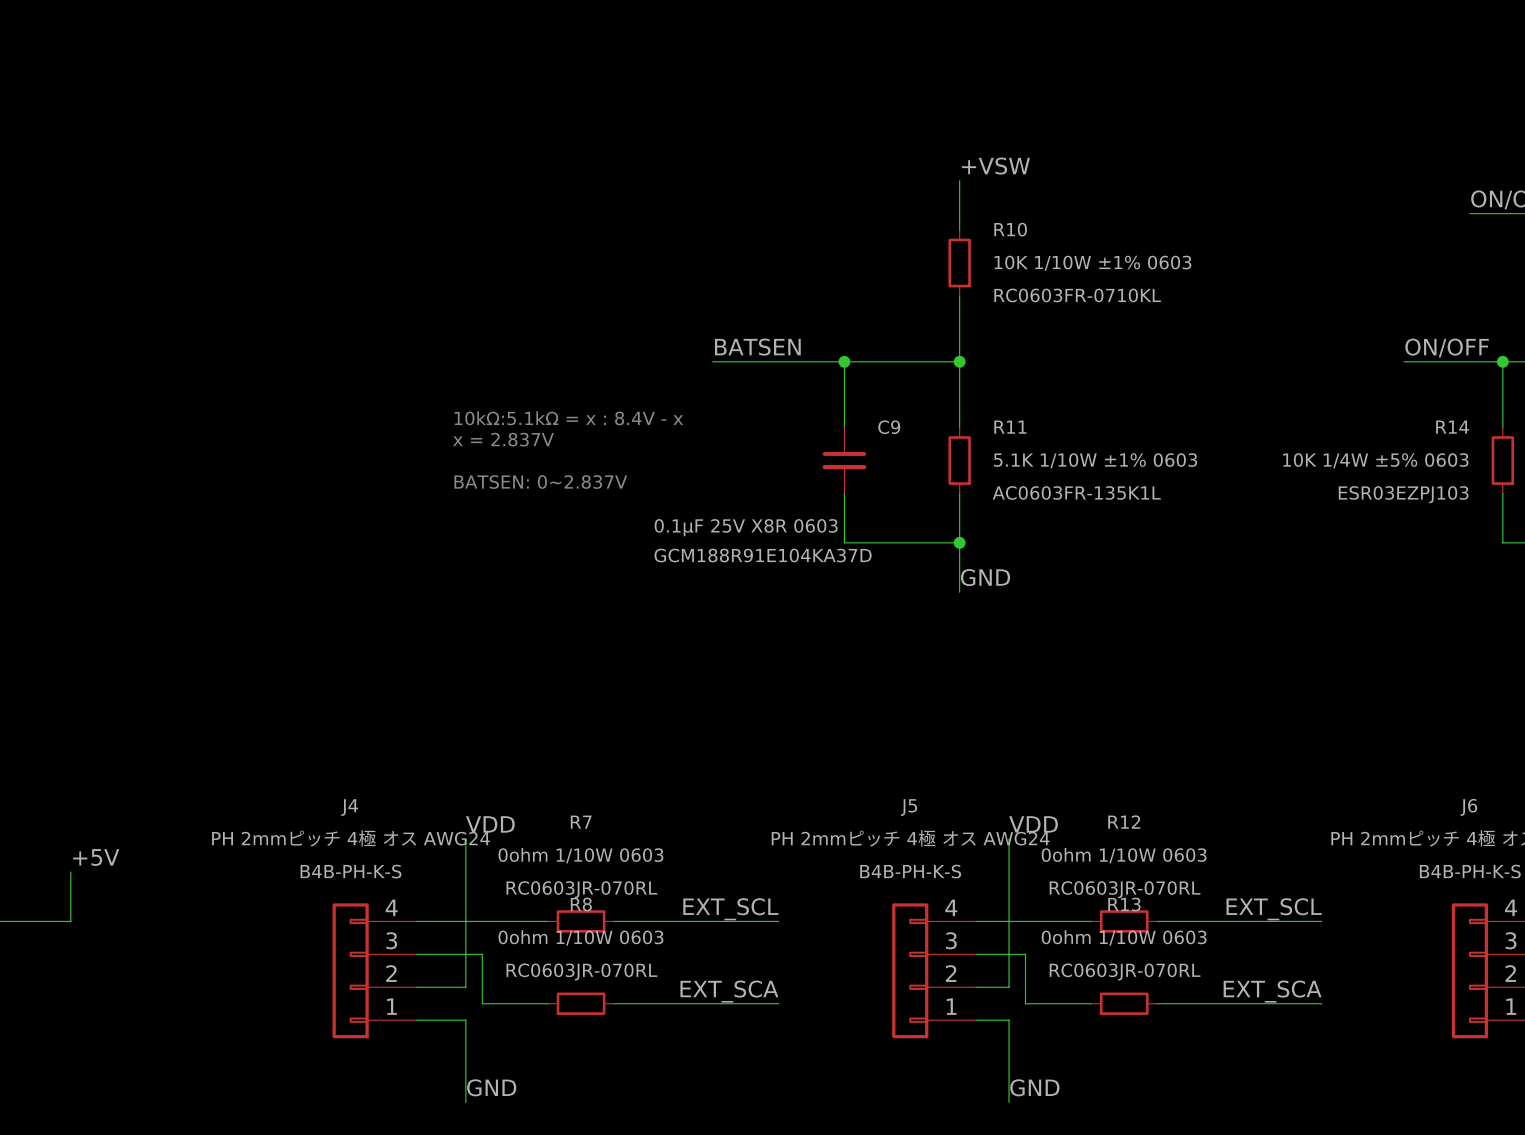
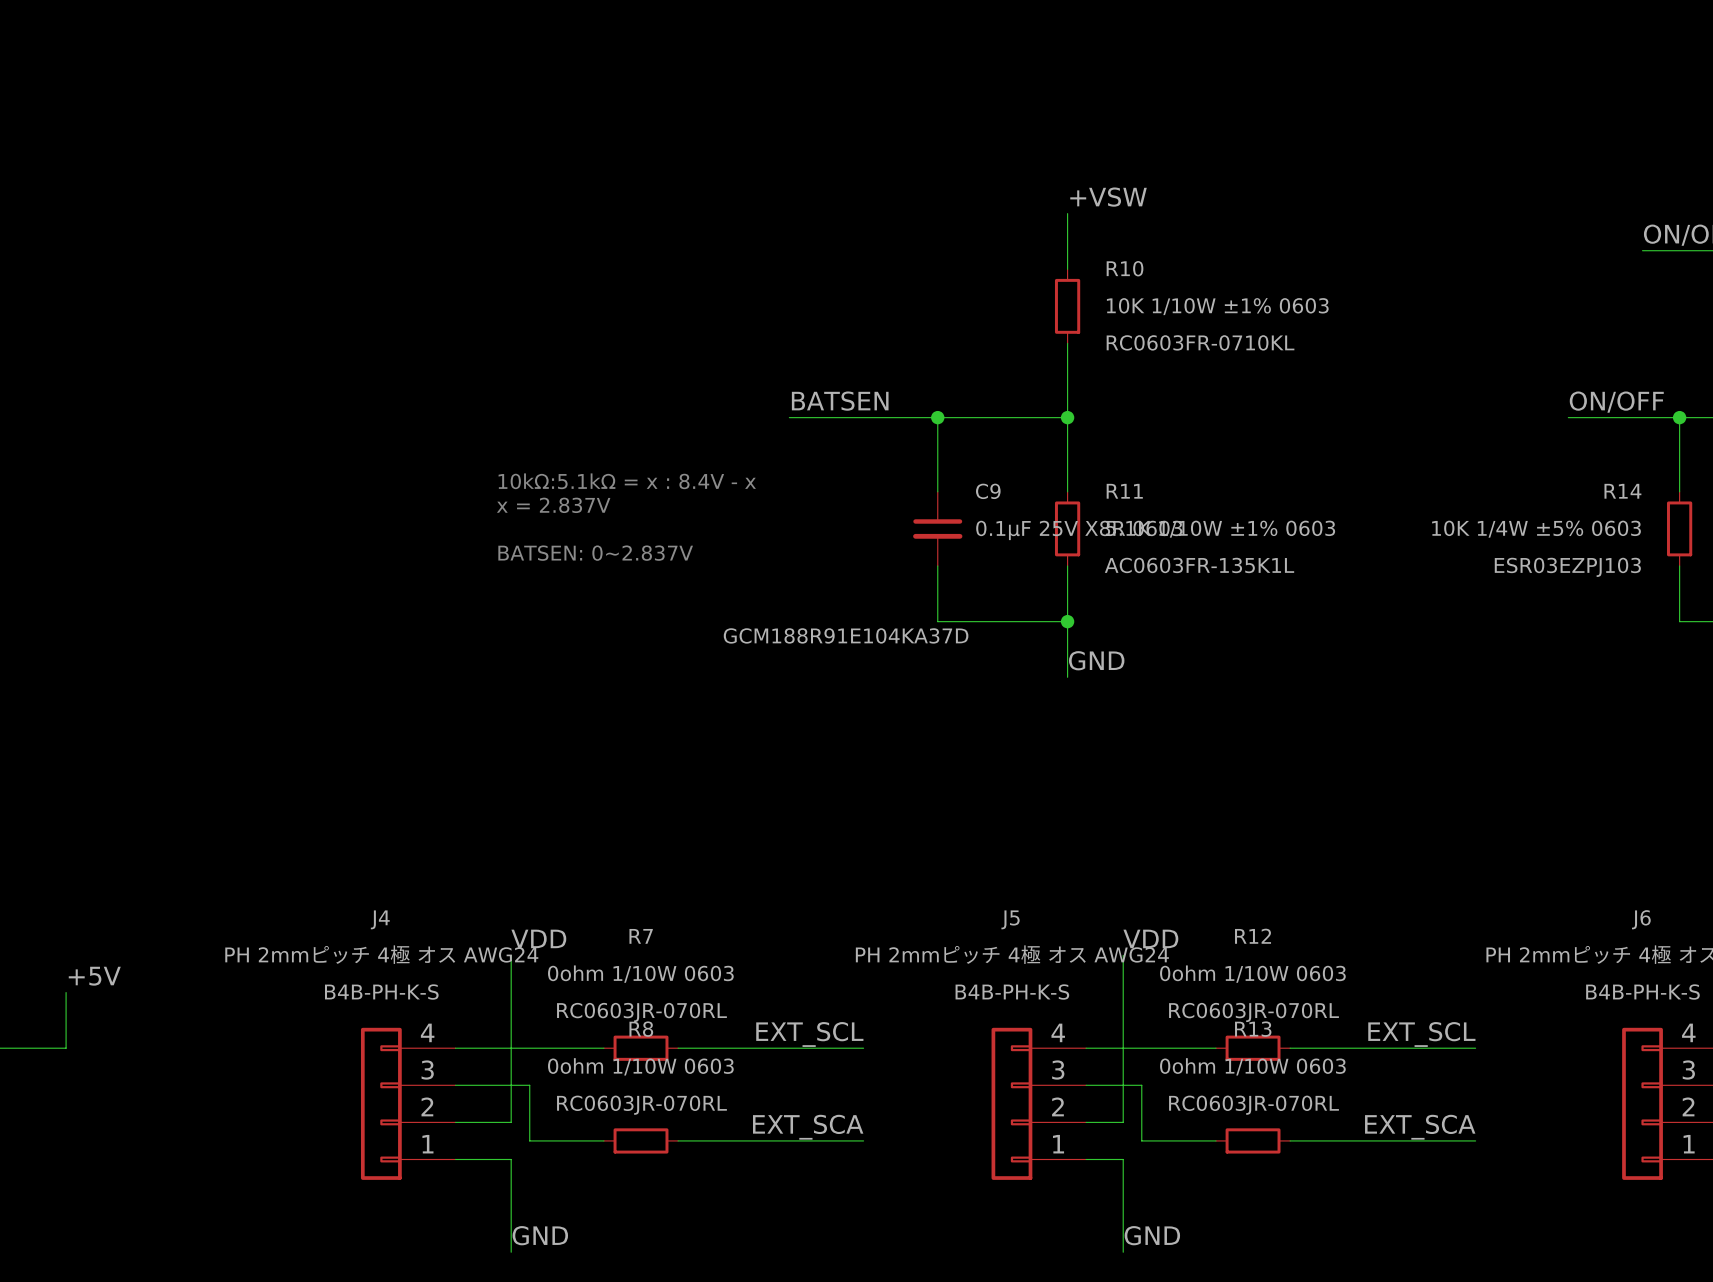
C9 value position: 0.1µF 25V X8R 0603 (746, 527) -> 0.1µF 25V X8R 0603 (1079, 530)

